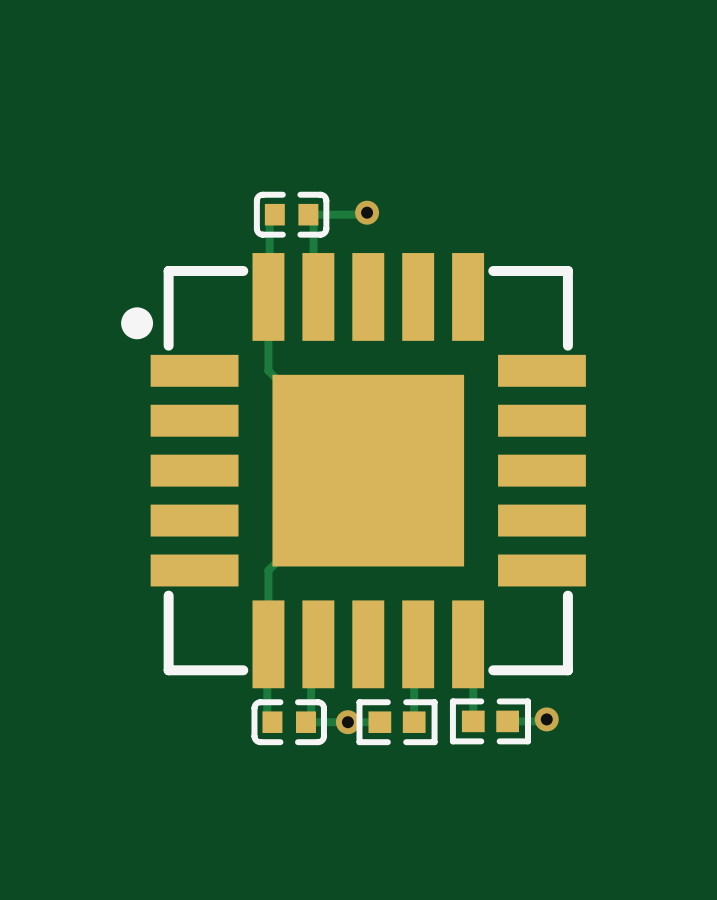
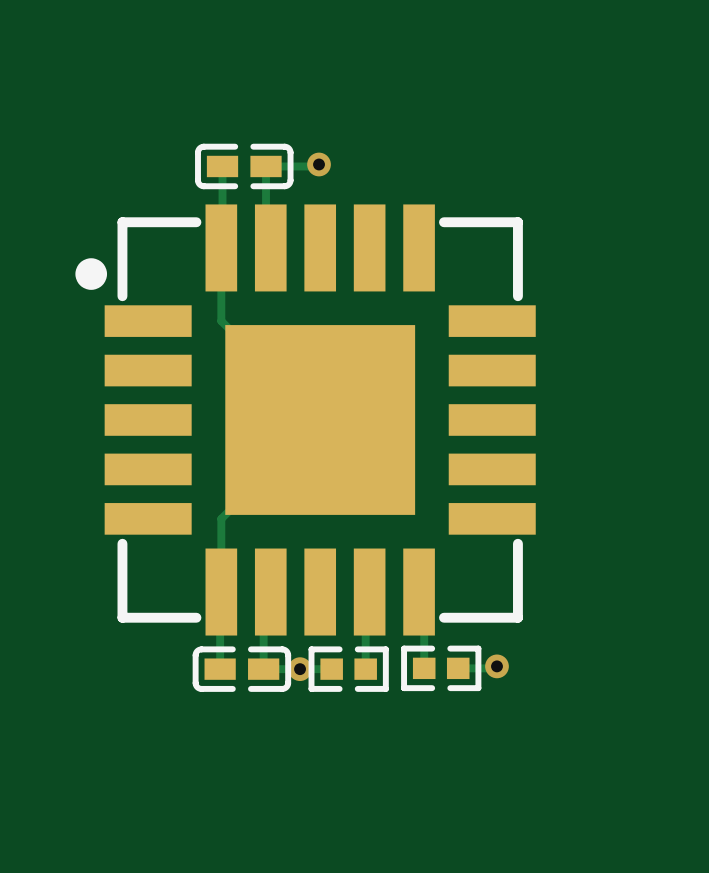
part footprint: [253, 191, 330, 238] -> [195, 143, 294, 190]
part footprint: [251, 699, 327, 746] -> [192, 646, 292, 692]

